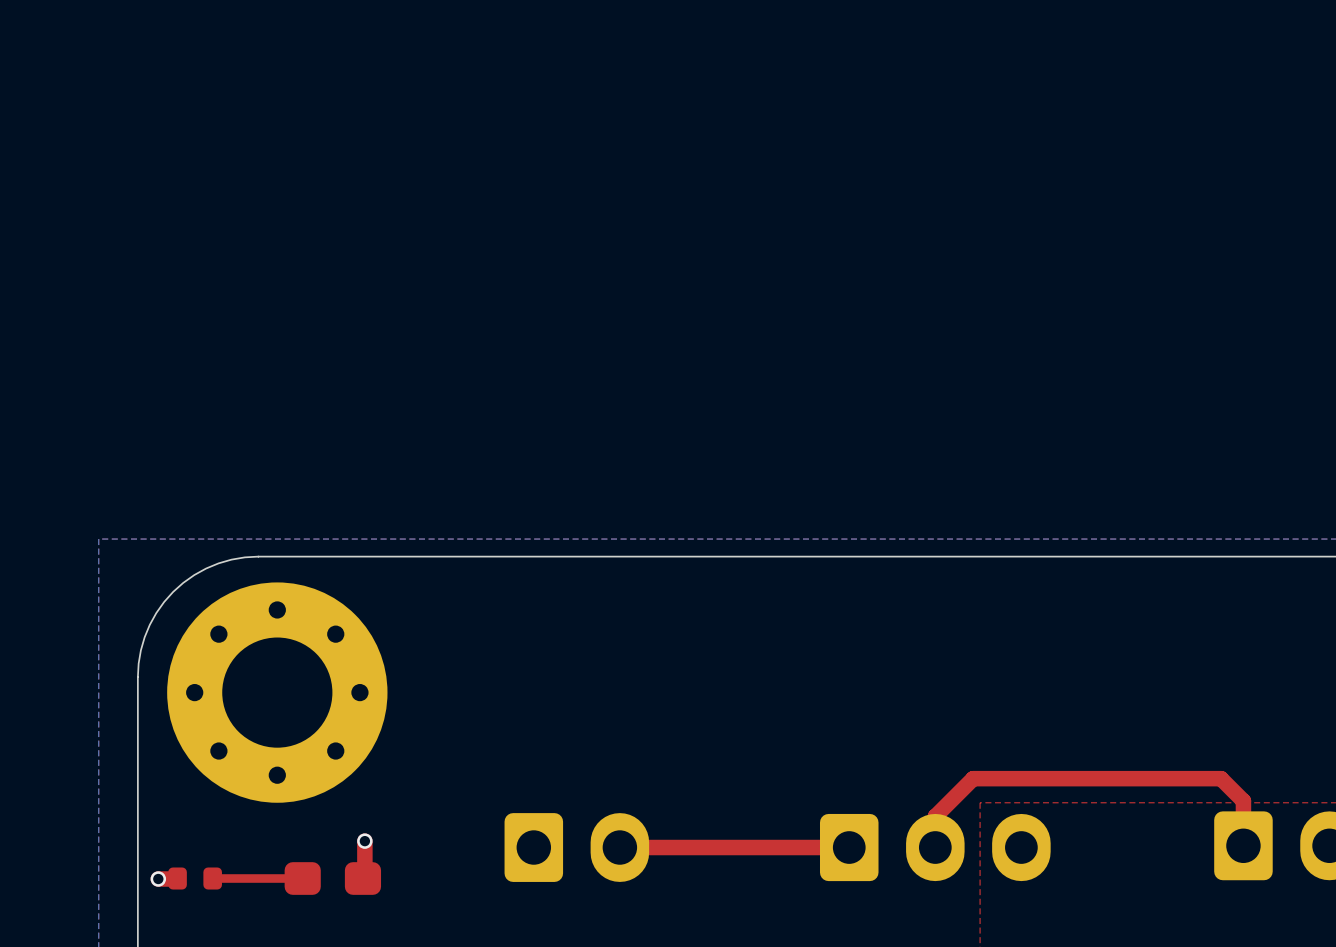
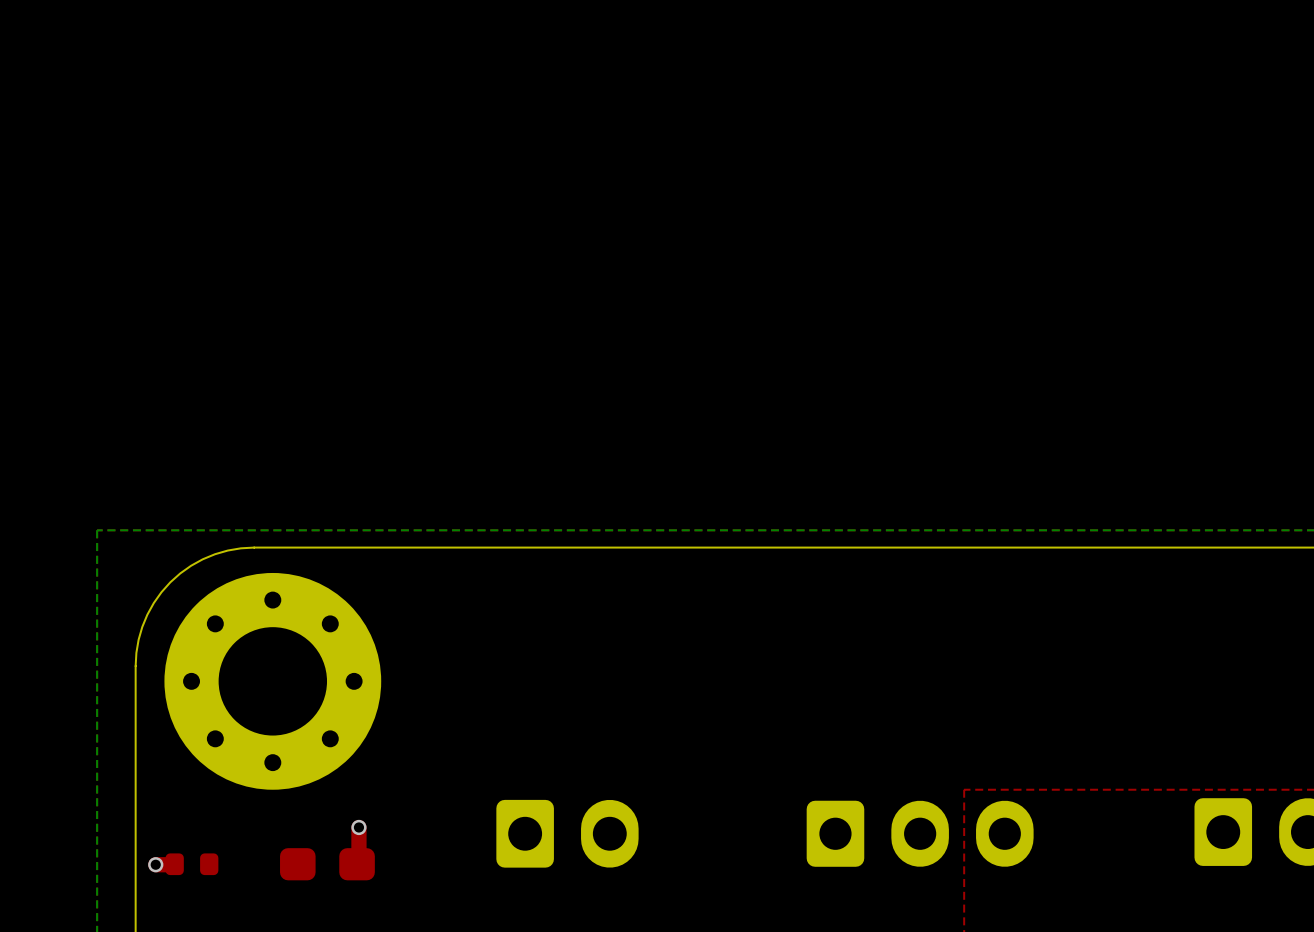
top track: (1243, 845) (1243, 801) (1221, 778) (973, 778) (935, 816) (935, 847) -> none
top track: (849, 847) (619, 847) -> none
top track: (302, 878) (212, 878) -> none

